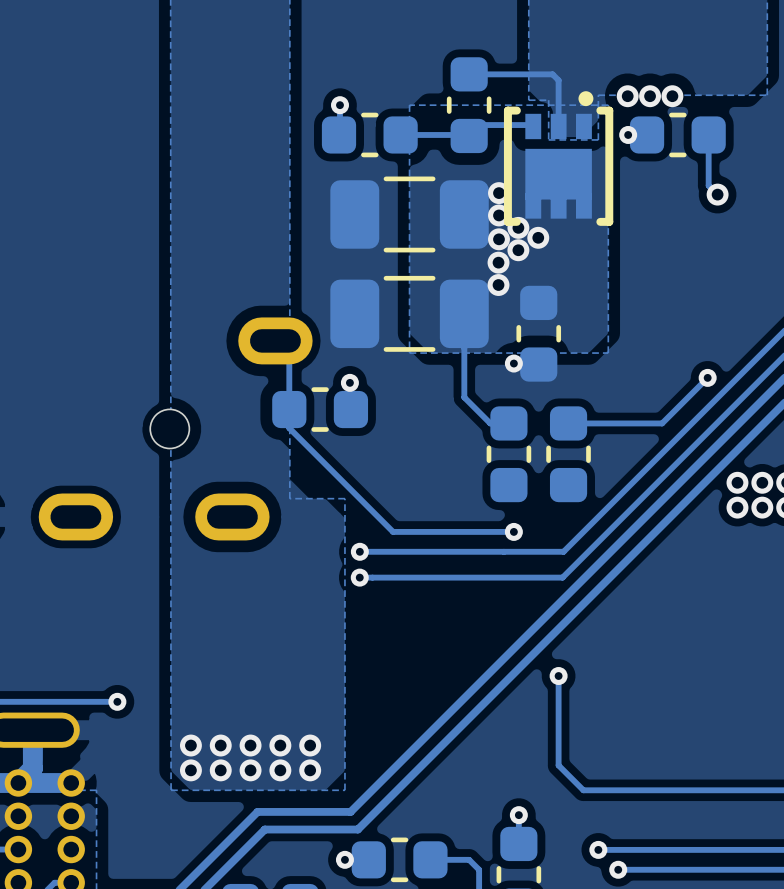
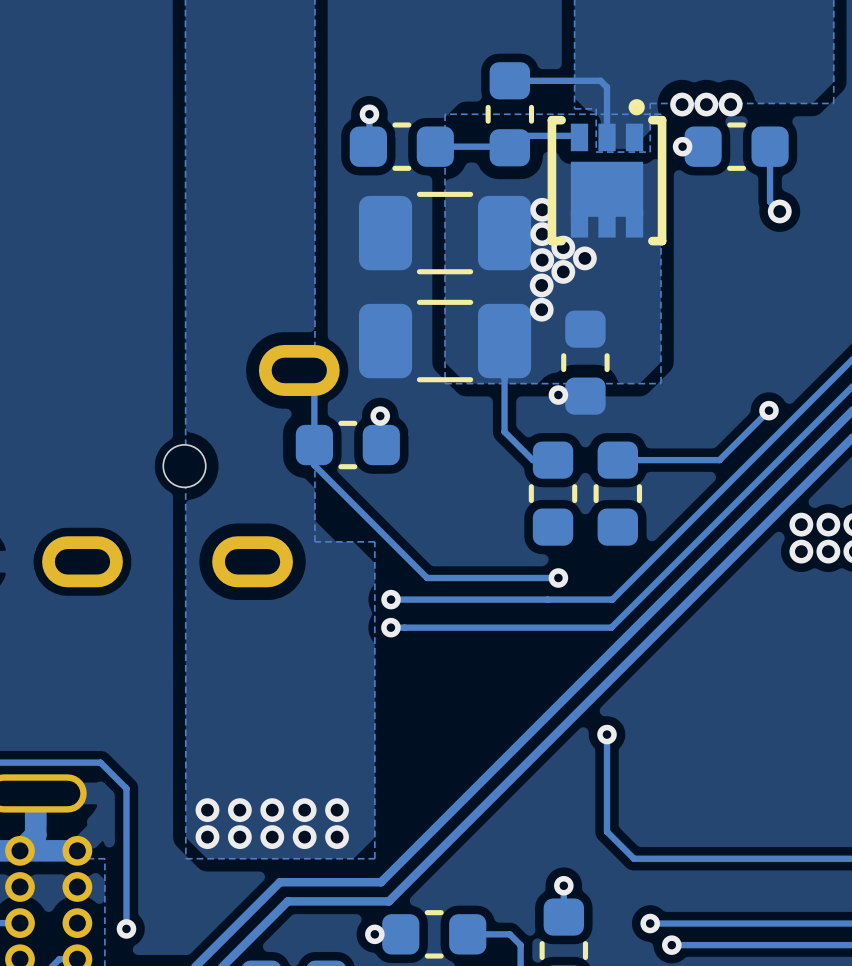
track: (117, 701) (92, 701) -> (126, 928) (126, 788) (100, 762)
via: (117, 701) -> none
via: none -> (126, 928)

